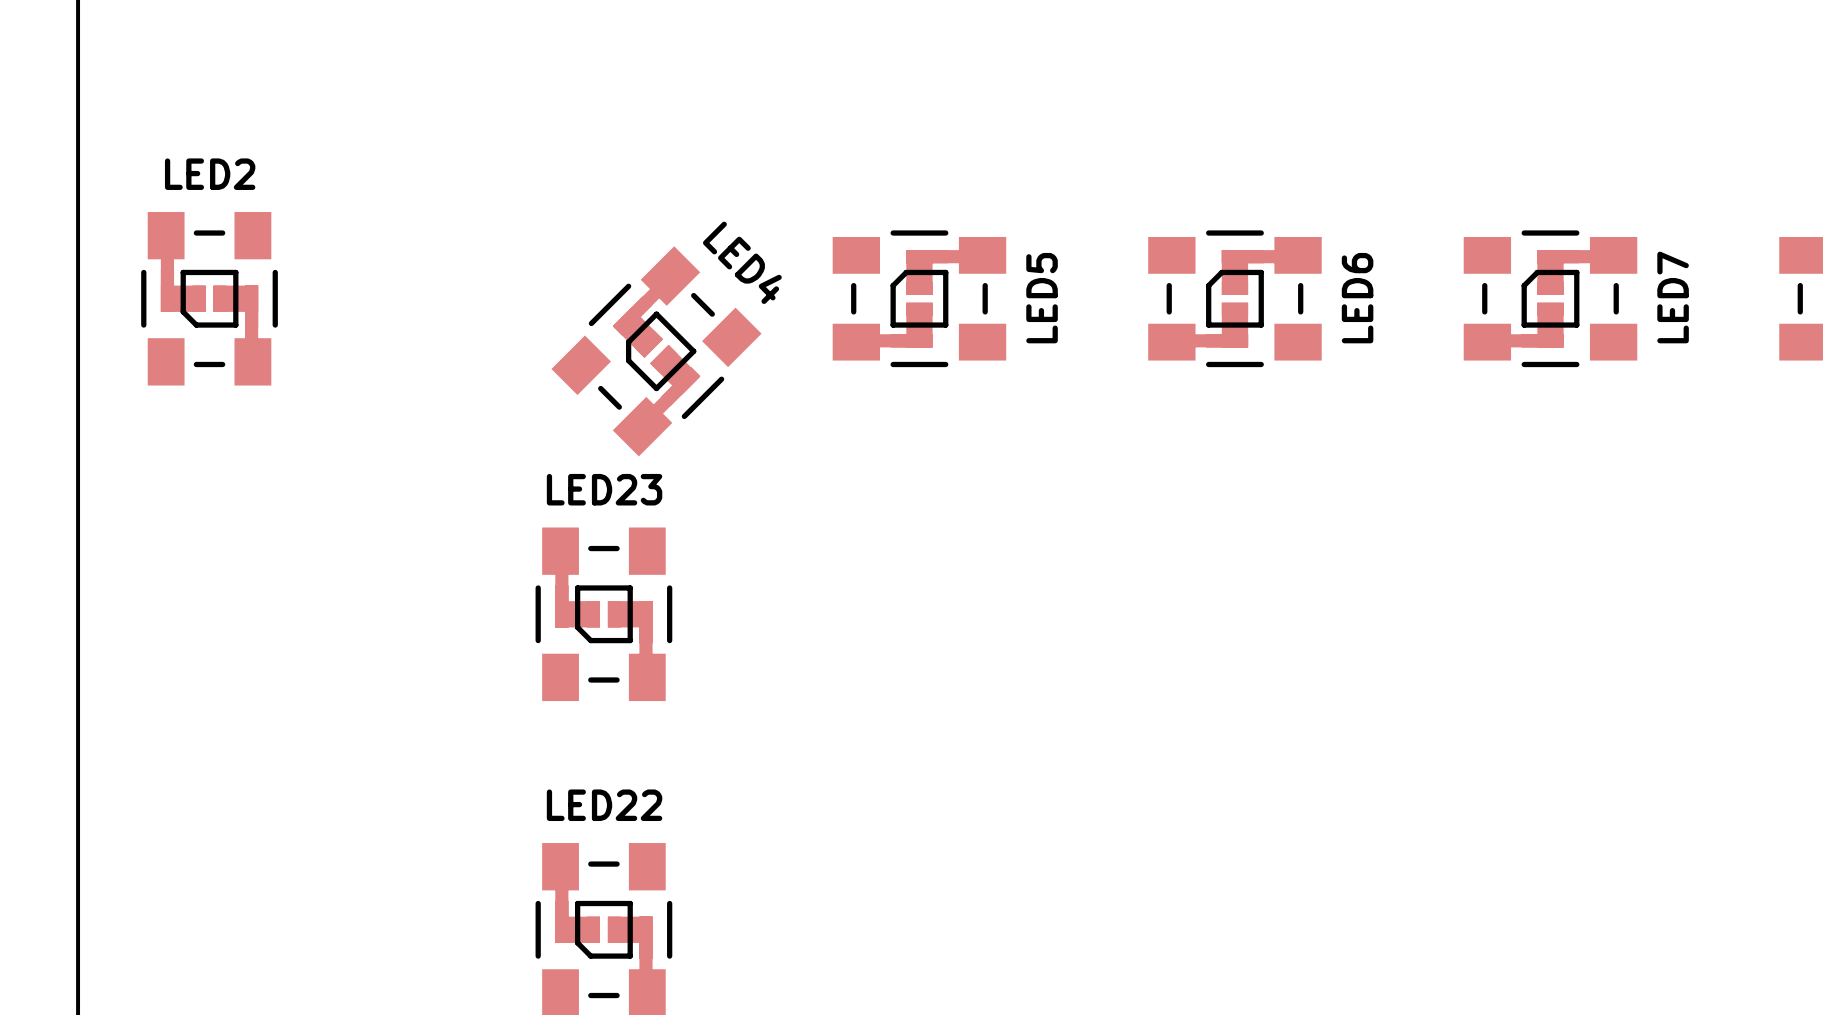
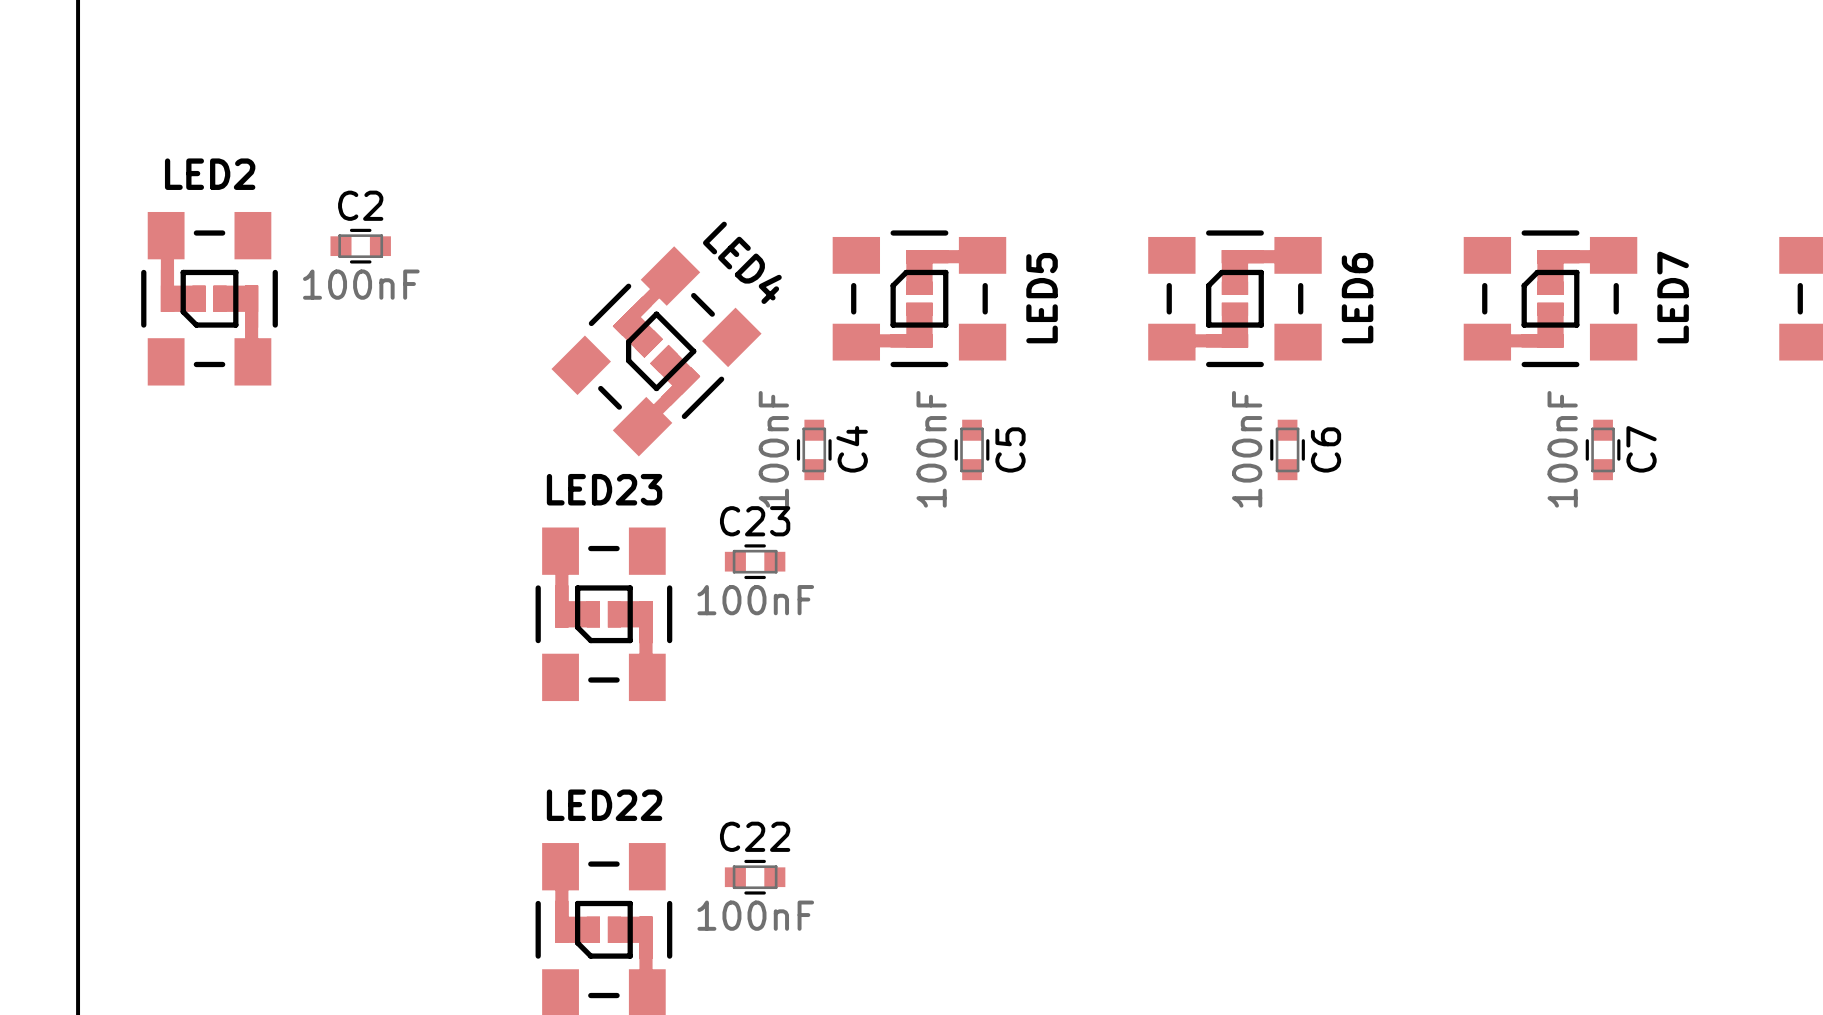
C2: none -> 100nF (360, 246)
C4: none -> 100nF (814, 449)
C5: none -> 100nF (972, 449)
C6: none -> 100nF (1287, 449)
C7: none -> 100nF (1603, 449)
C23: none -> 100nF (755, 561)
C22: none -> 100nF (755, 877)

